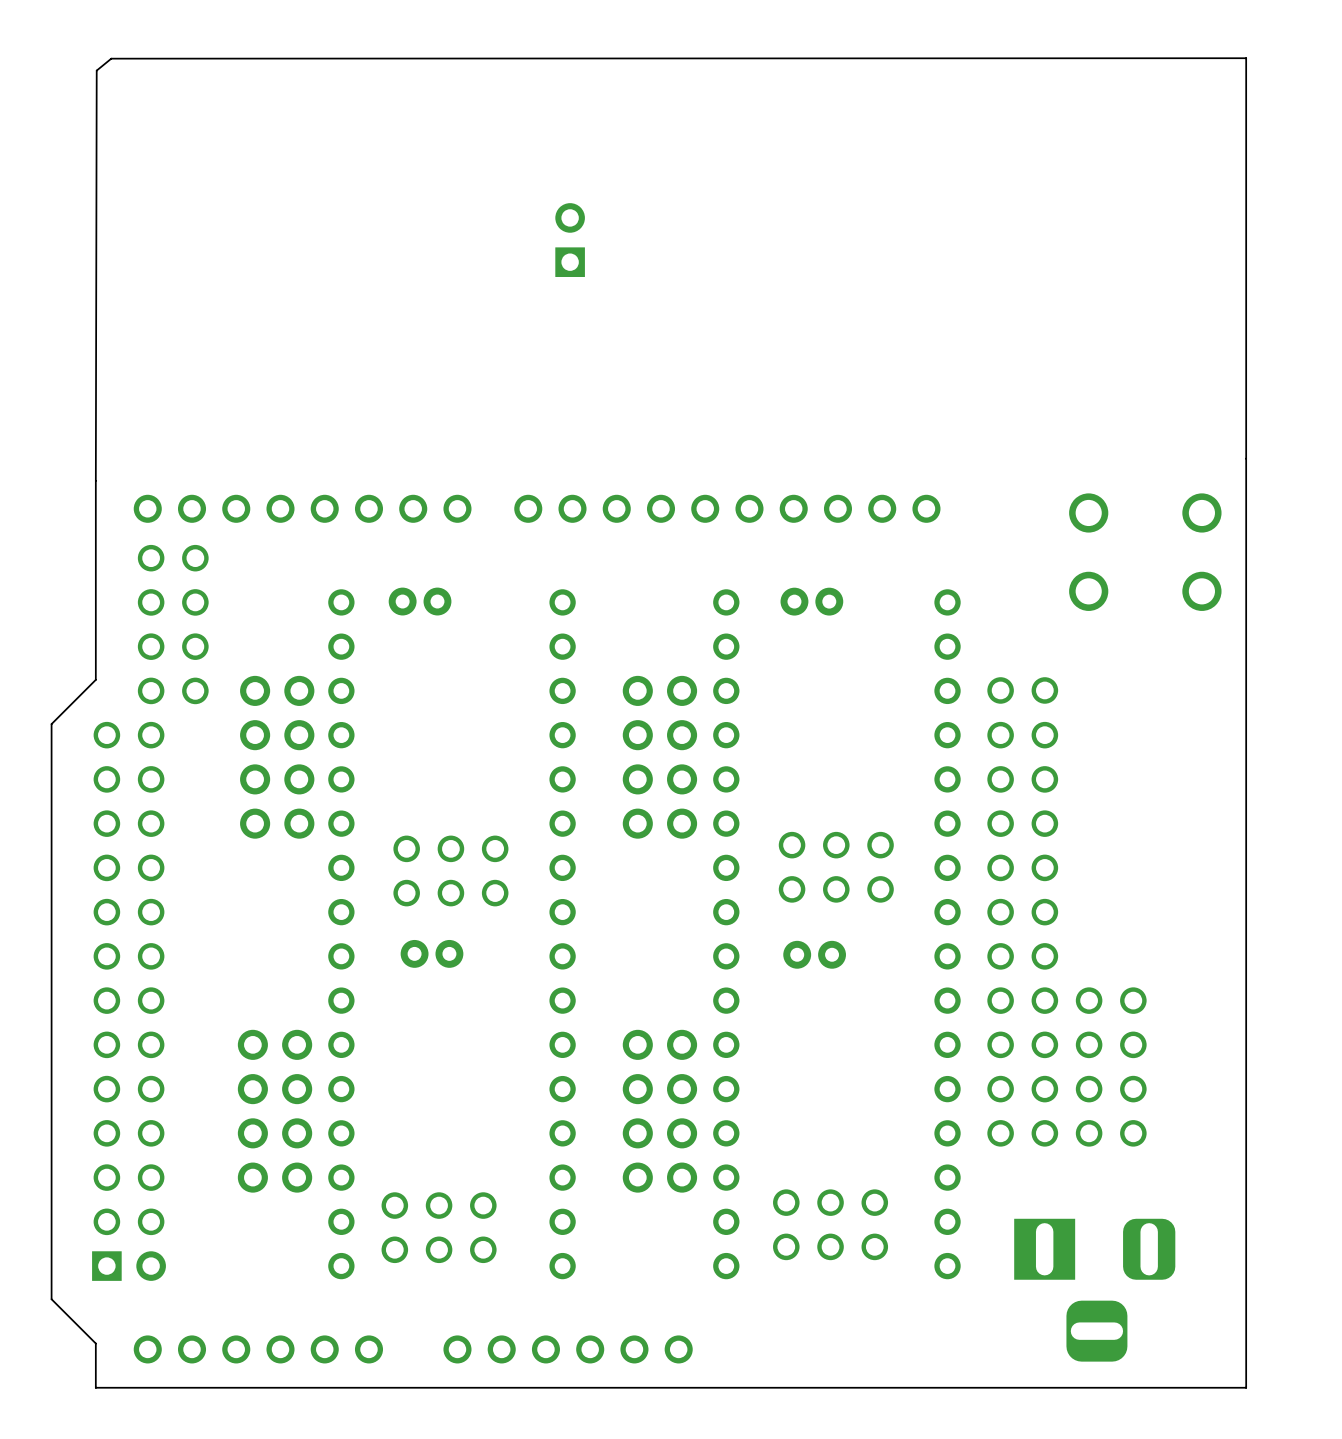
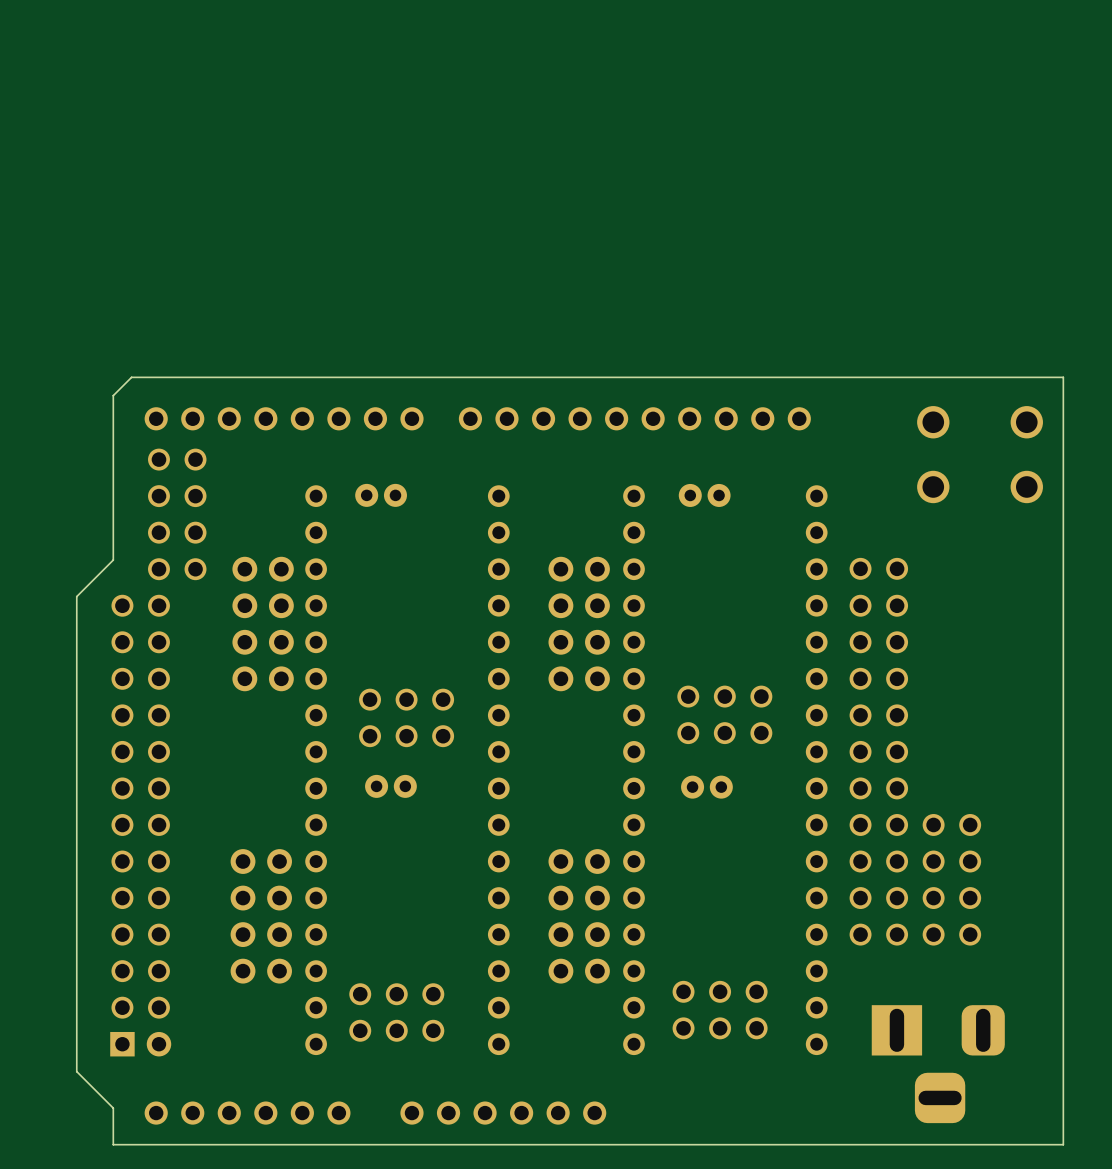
part: (570, 240) -> none
board edge: (1246, 458) (1246, 58) (111, 58) (96, 70) (95, 480) -> (1063, 377) (131, 377) (113, 395)

